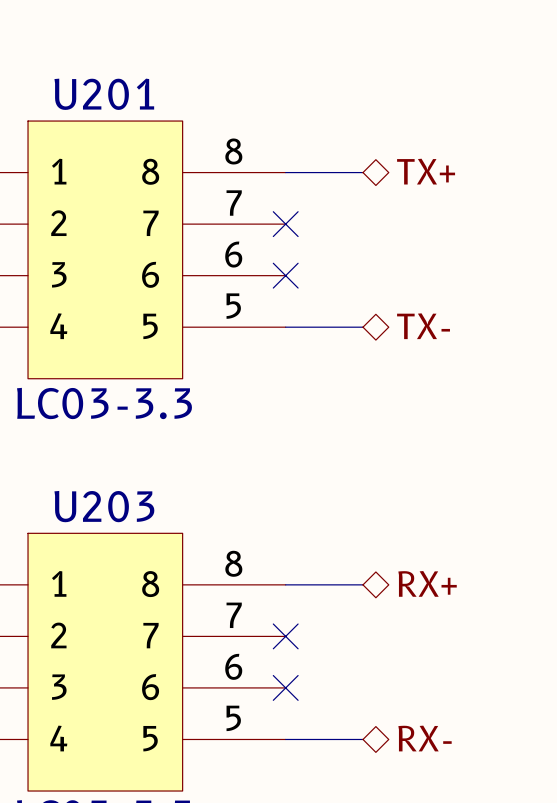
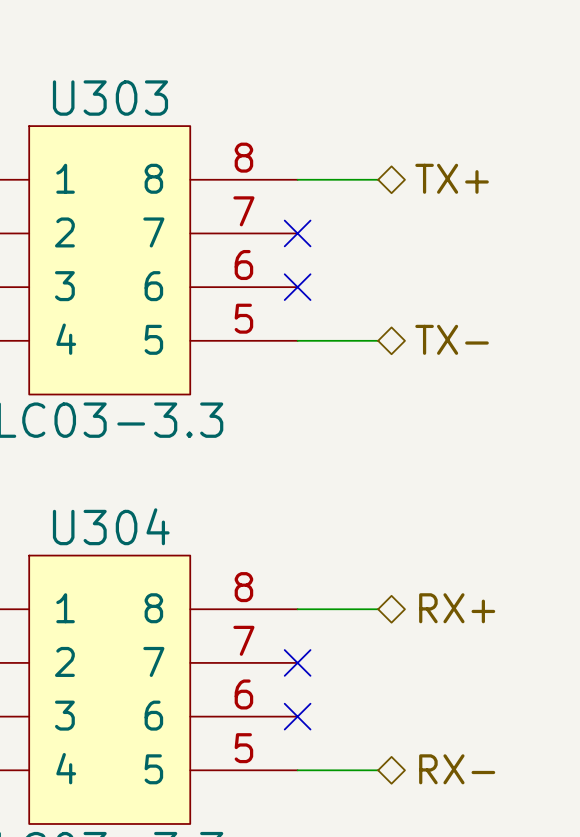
U201 name: U201 (104, 94) -> U303 (110, 98)
U203 name: U203 (104, 506) -> U304 (111, 526)

